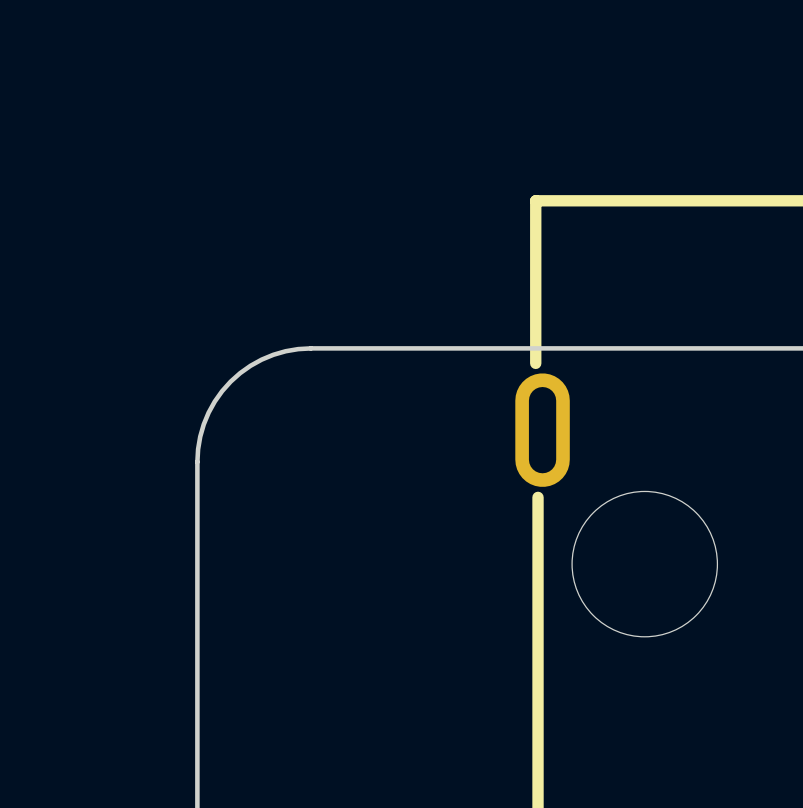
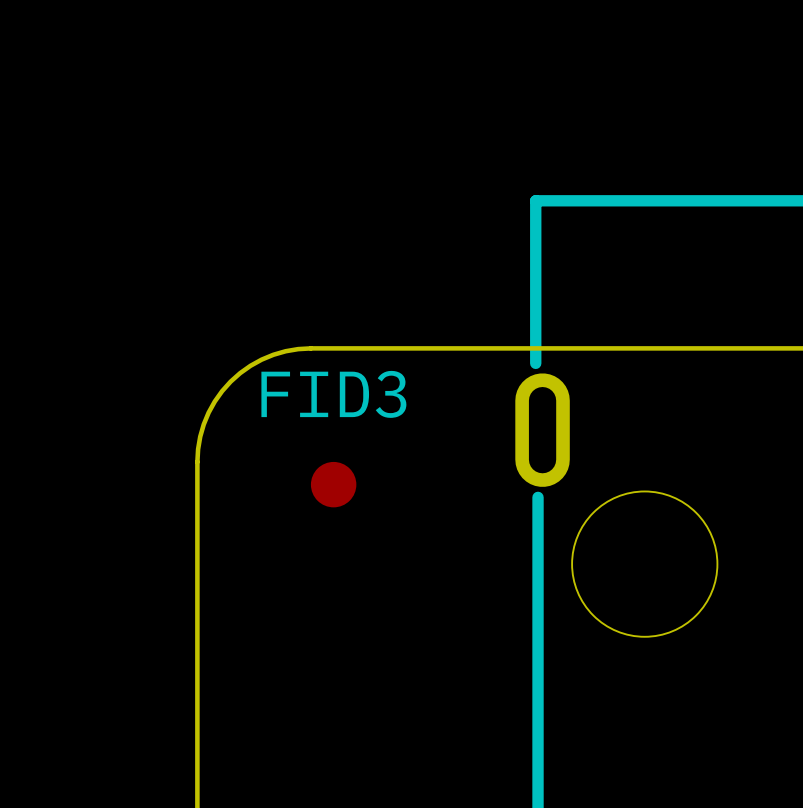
FID3: none -> (333, 484)

